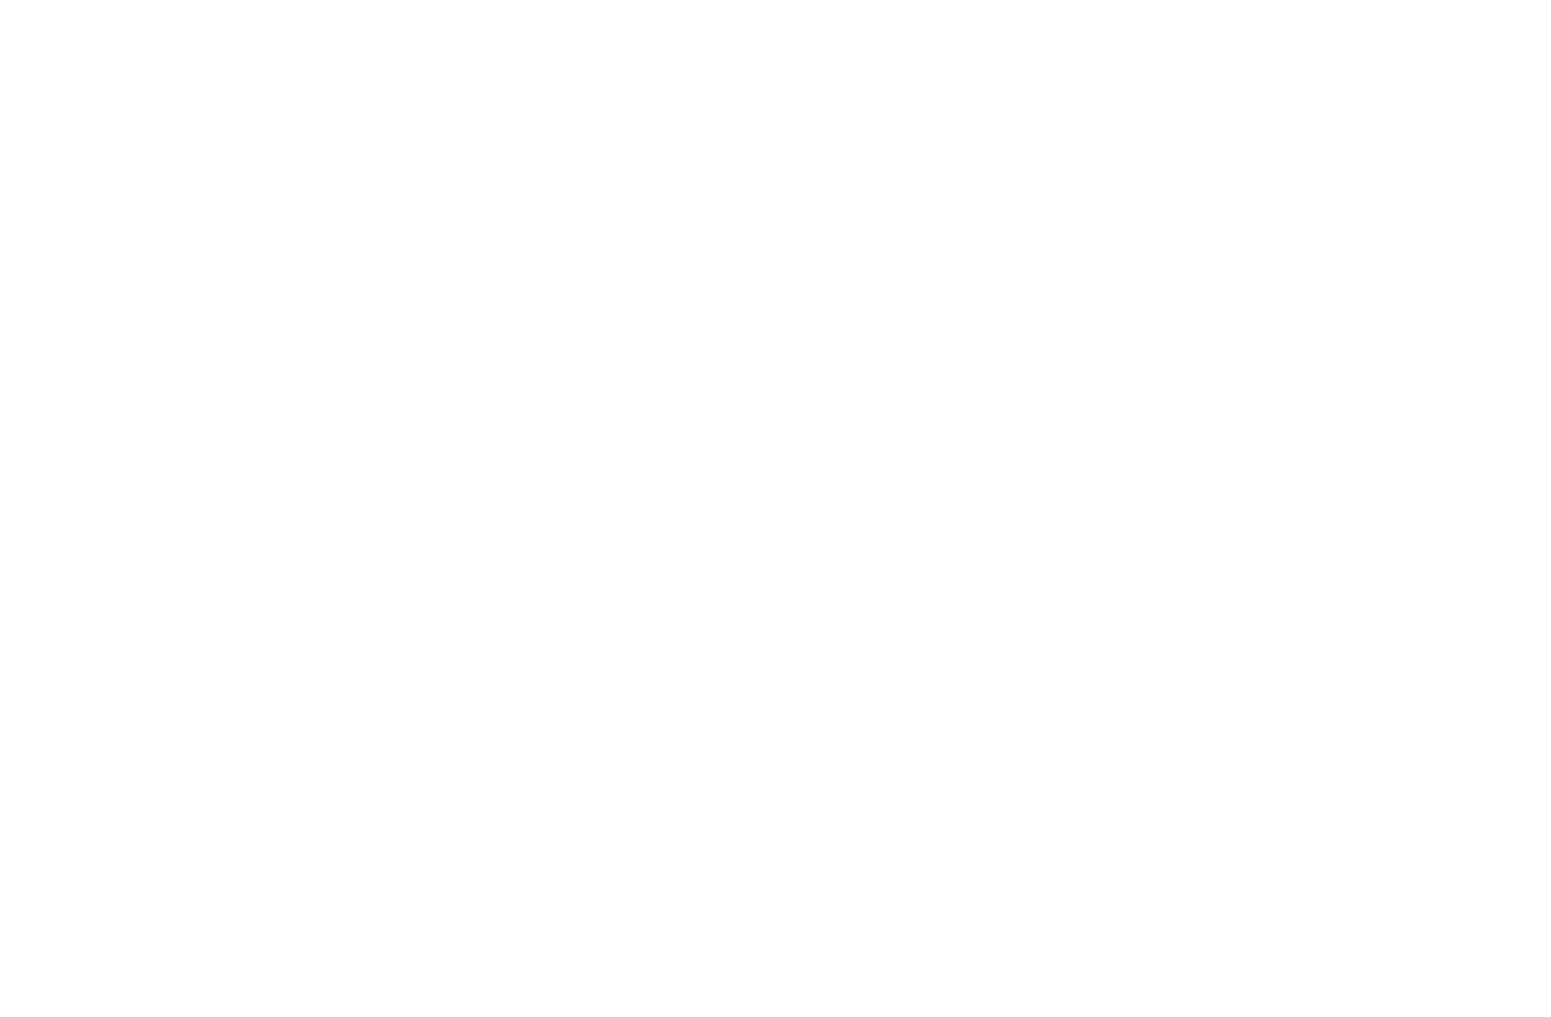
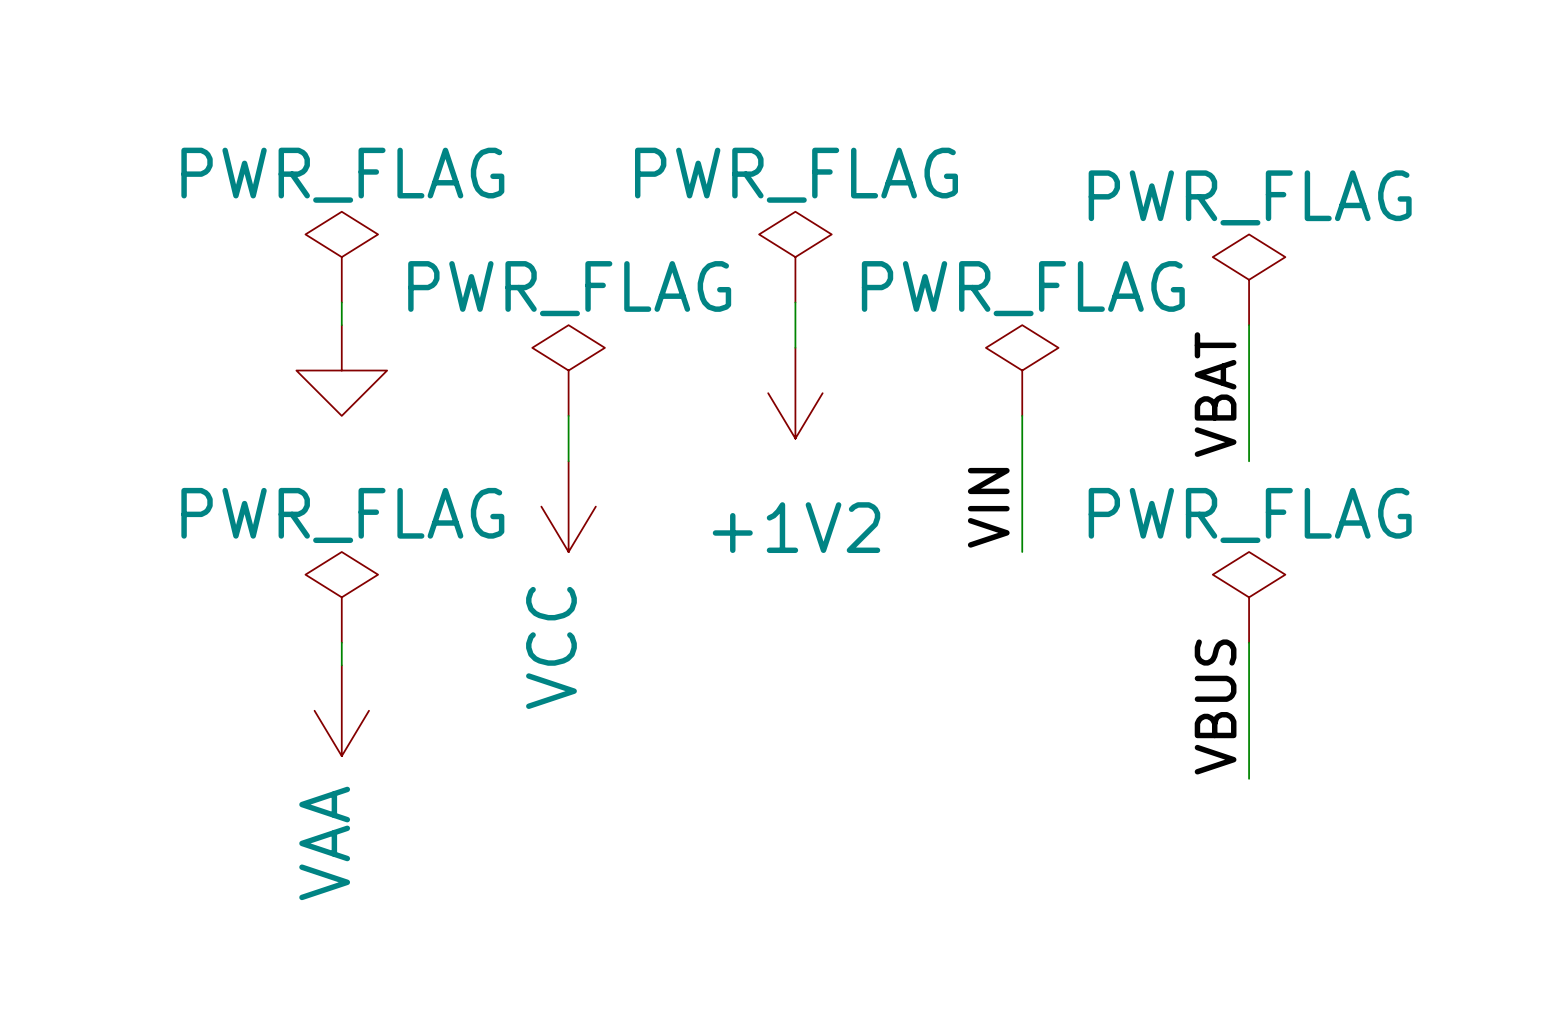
power symbol: none -> PWR_FLAG (341, 257)
power symbol: none -> PWR_FLAG (795, 257)
power symbol: none -> PWR_FLAG (1249, 279)
wire: none -> (341, 302) (341, 325)
wire: none -> (795, 302) (795, 347)
wire: none -> (1249, 325) (1249, 461)
power symbol: none -> (341, 370)
power symbol: none -> PWR_FLAG (568, 370)
power symbol: none -> PWR_FLAG (1022, 370)
power symbol: none -> +1V2 (795, 393)
label: none -> VBAT (1215, 394)
wire: none -> (568, 415) (568, 461)
wire: none -> (1022, 415) (1022, 551)
power symbol: none -> VCC (568, 506)
label: none -> VIN (988, 507)
power symbol: none -> PWR_FLAG (341, 597)
power symbol: none -> PWR_FLAG (1249, 597)
wire: none -> (341, 642) (341, 665)
wire: none -> (1249, 642) (1249, 778)
label: none -> VBUS (1215, 706)
power symbol: none -> VAA (341, 710)

